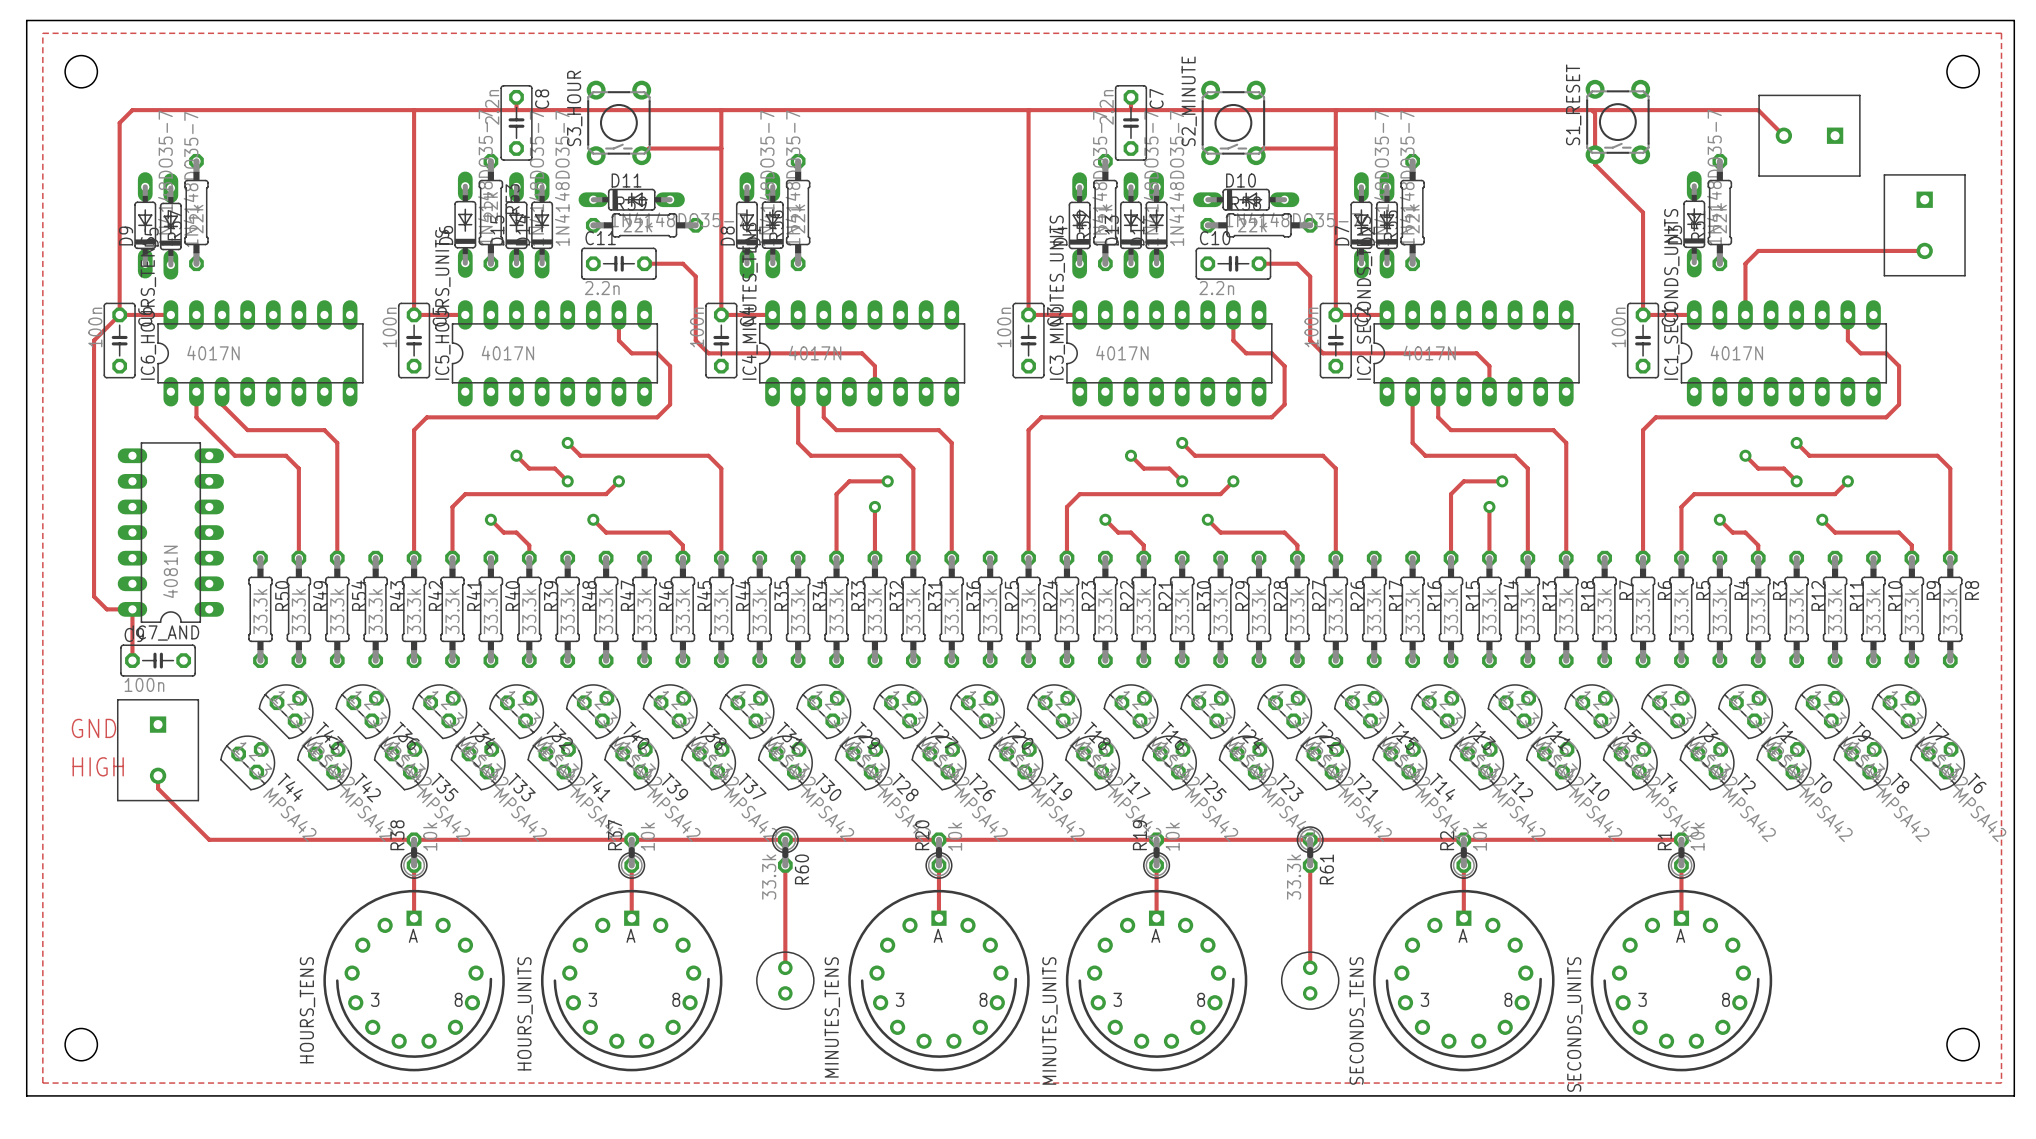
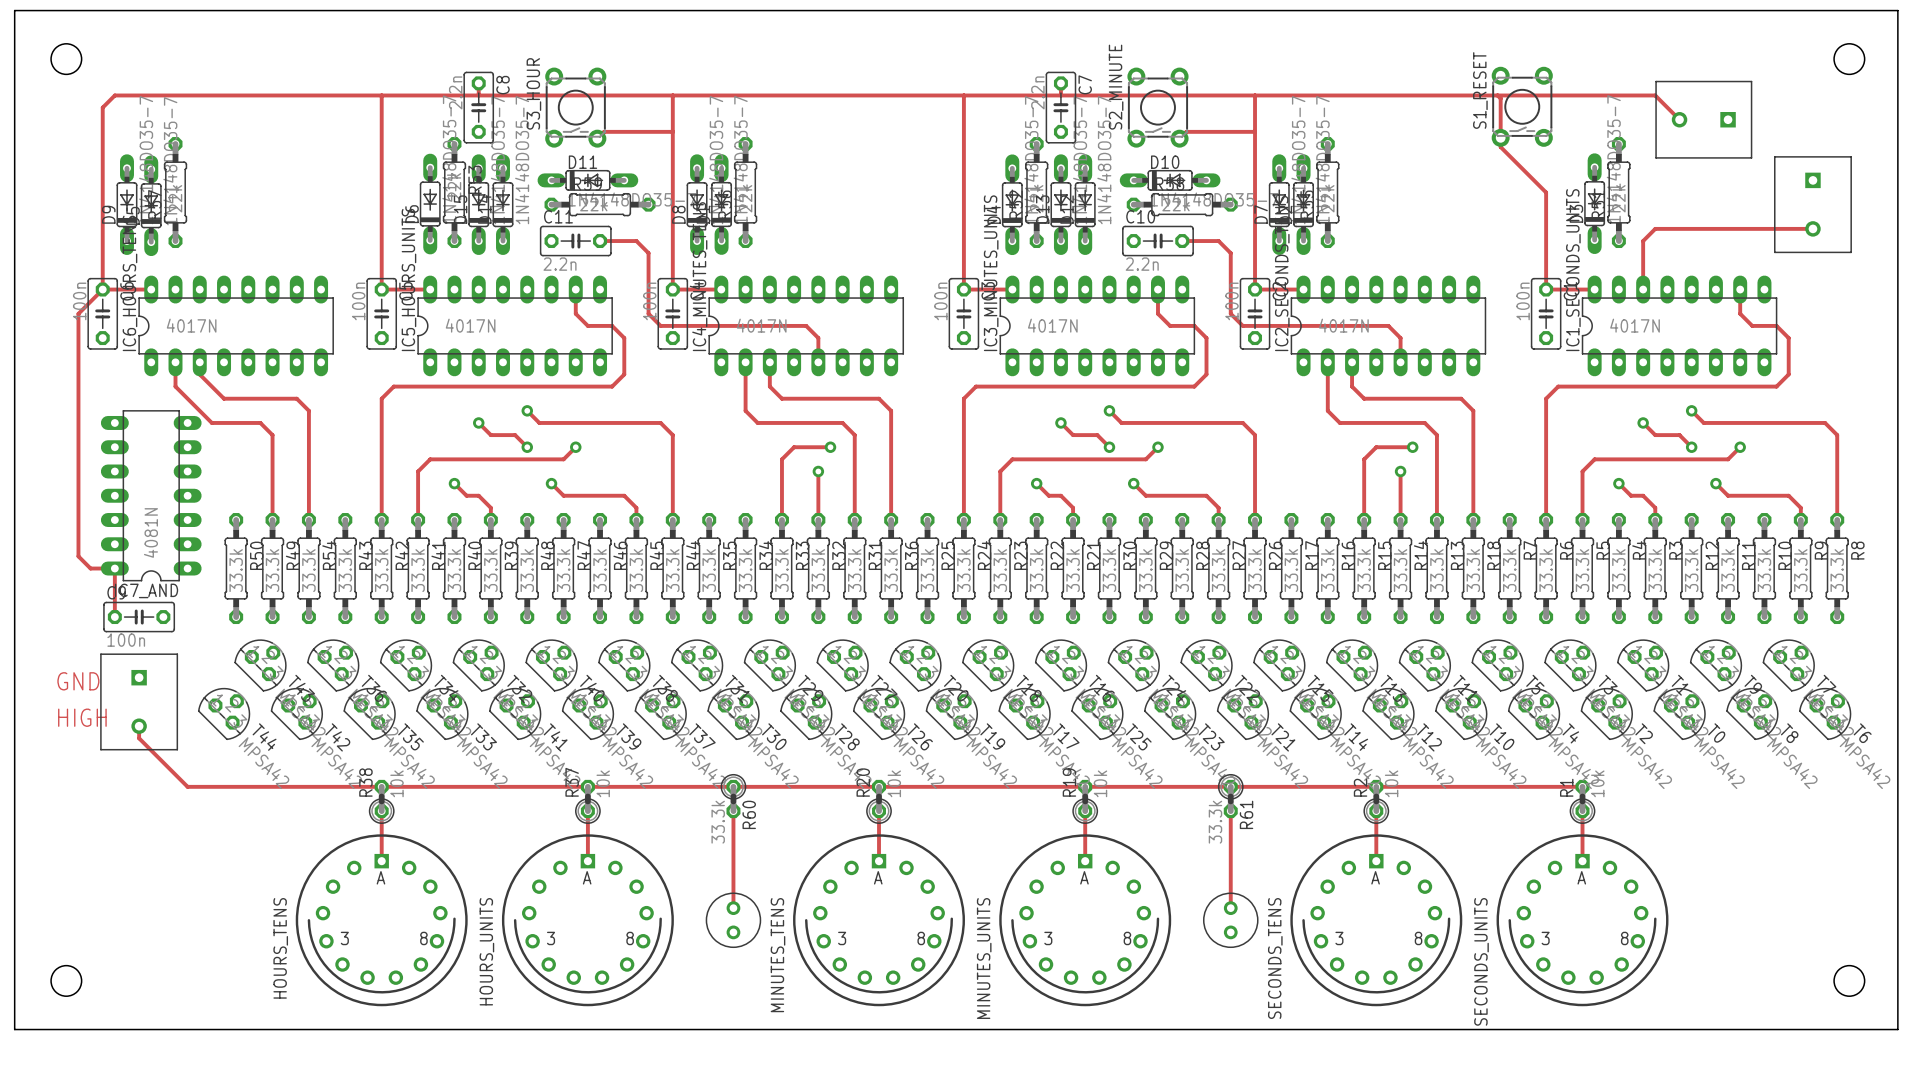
zone outline: (42, 33) (2001, 33) (2001, 1083) (42, 1083) (42, 33) -> none

